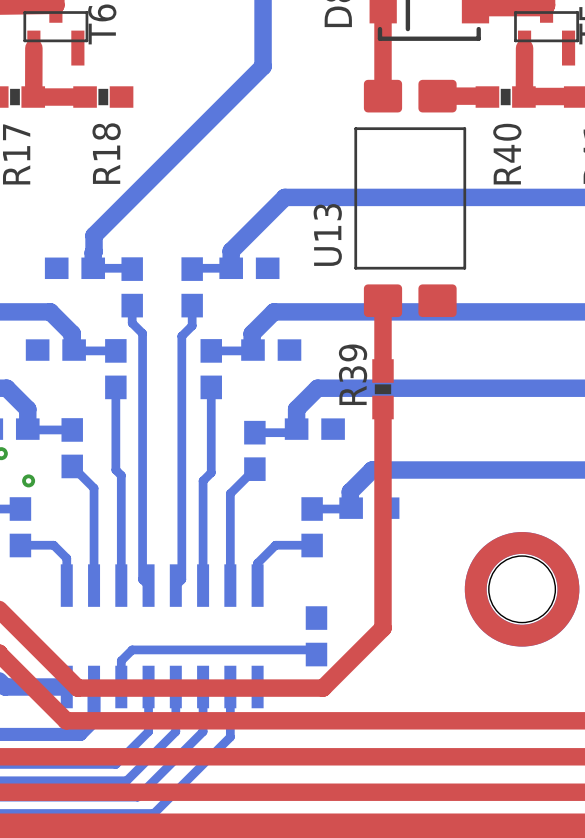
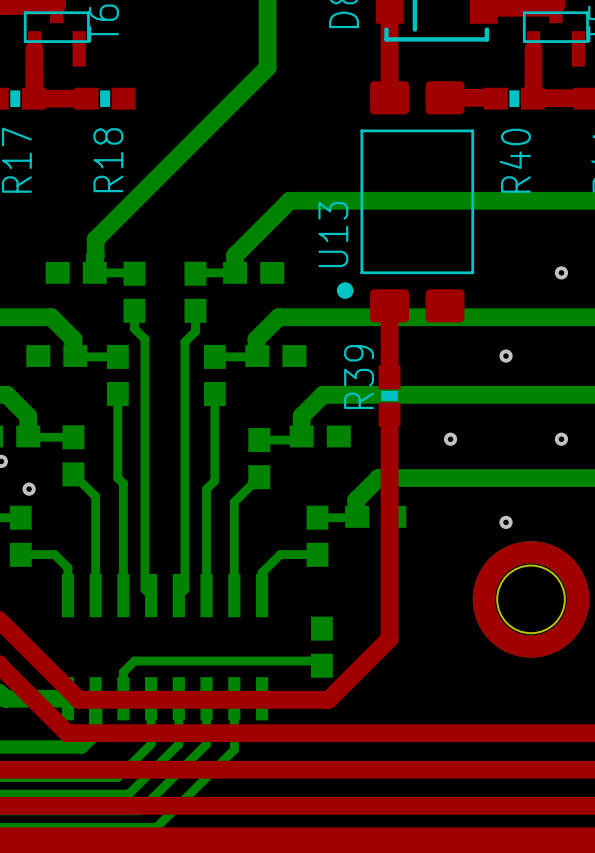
U13 footprint: [354, 79, 467, 318] -> [336, 81, 475, 323]
via: none -> (561, 272)
via: none -> (506, 356)
via: none -> (450, 439)
via: none -> (561, 439)
via: none -> (506, 522)

